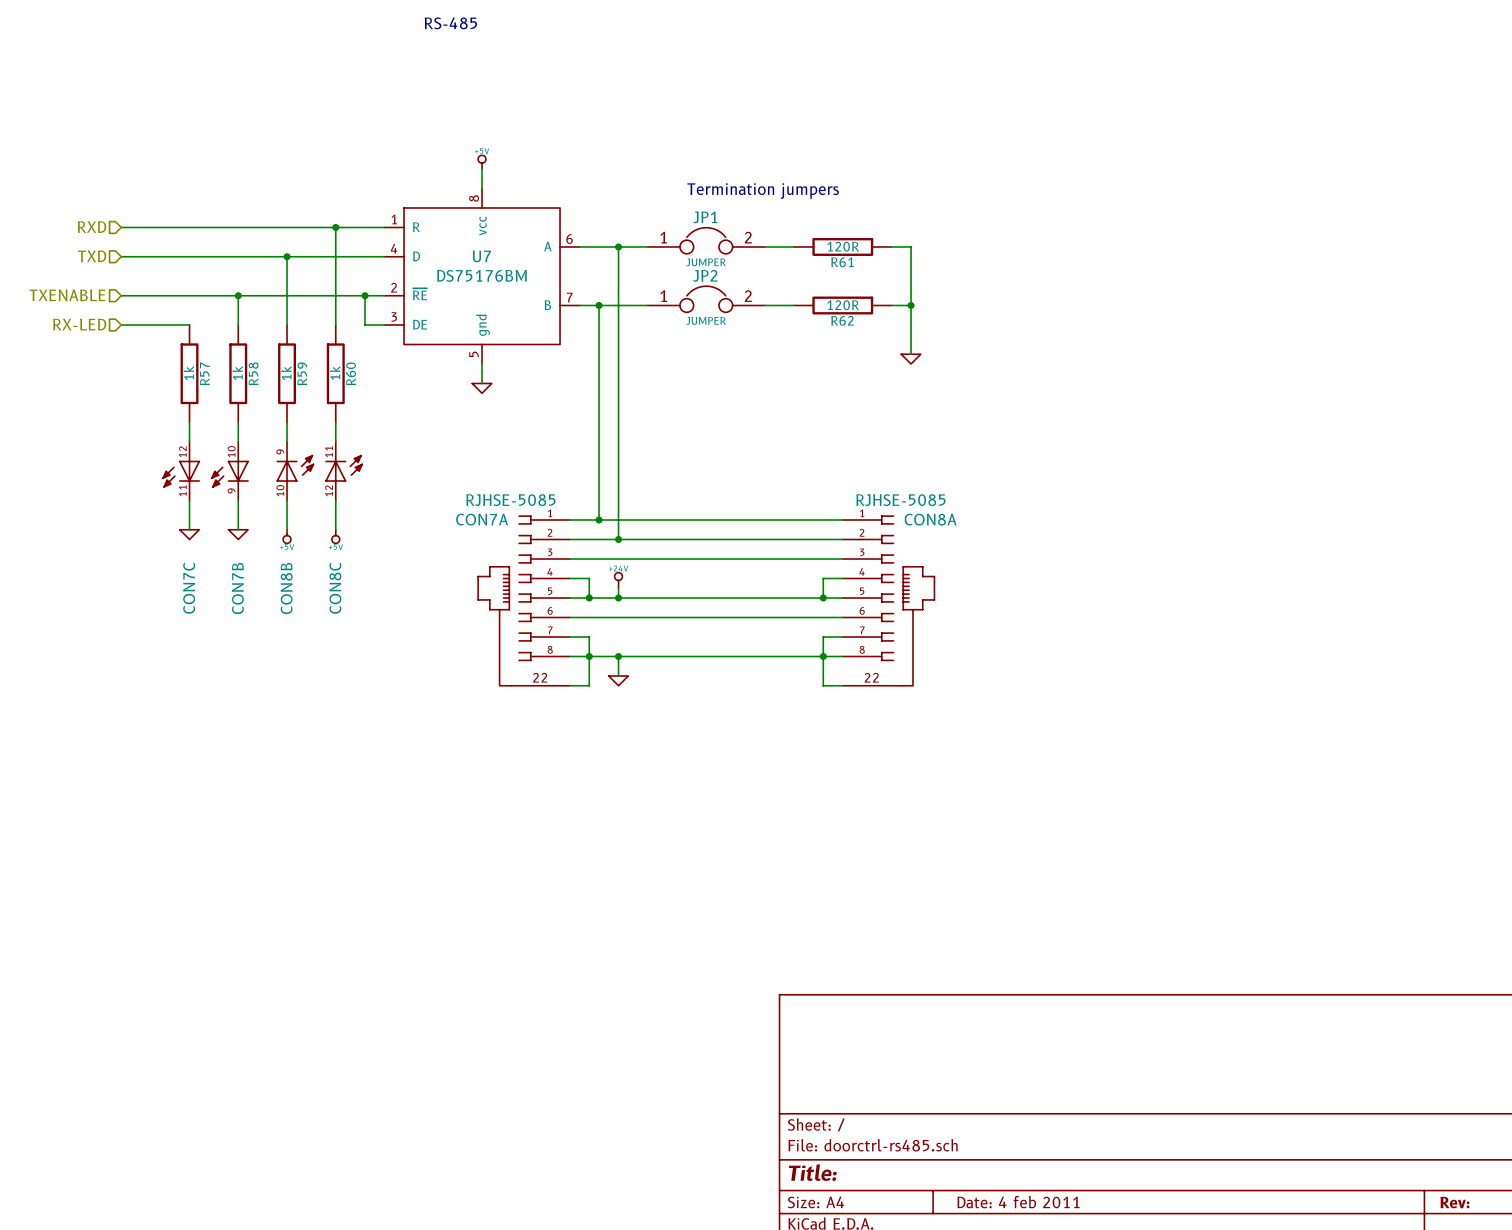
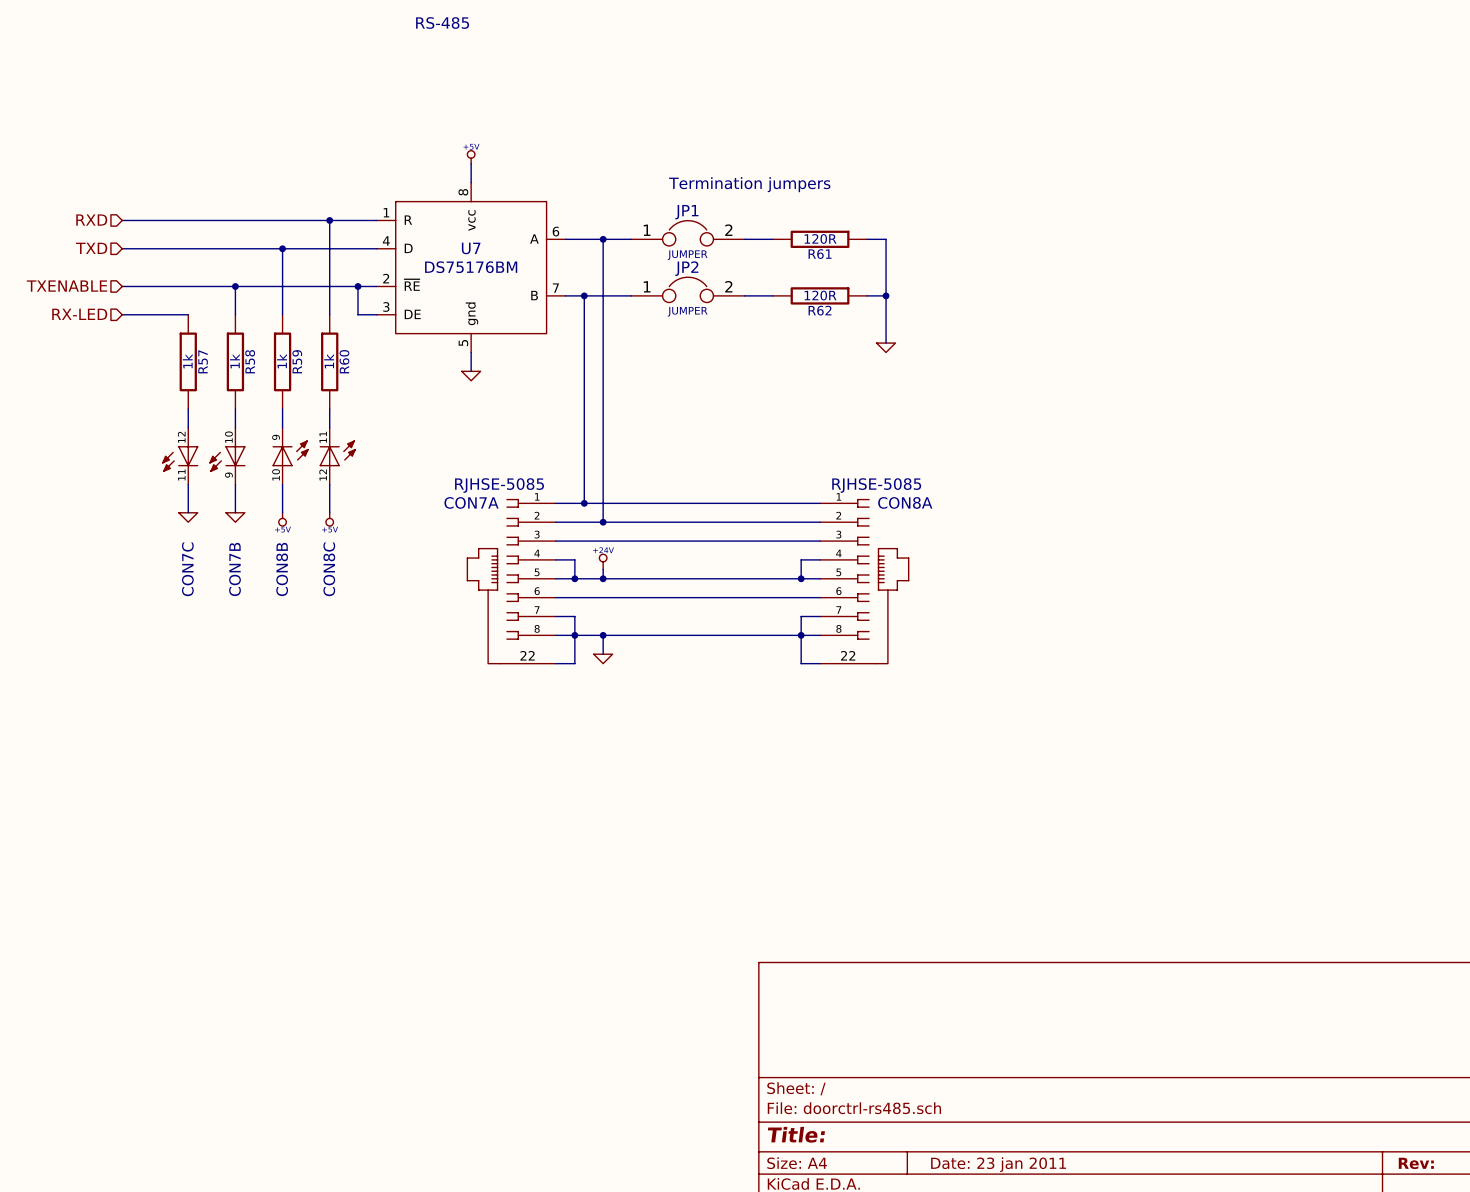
title block: Date: 4 feb 2011 (1018, 1202) -> Date: 23 jan 2011 (998, 1164)

